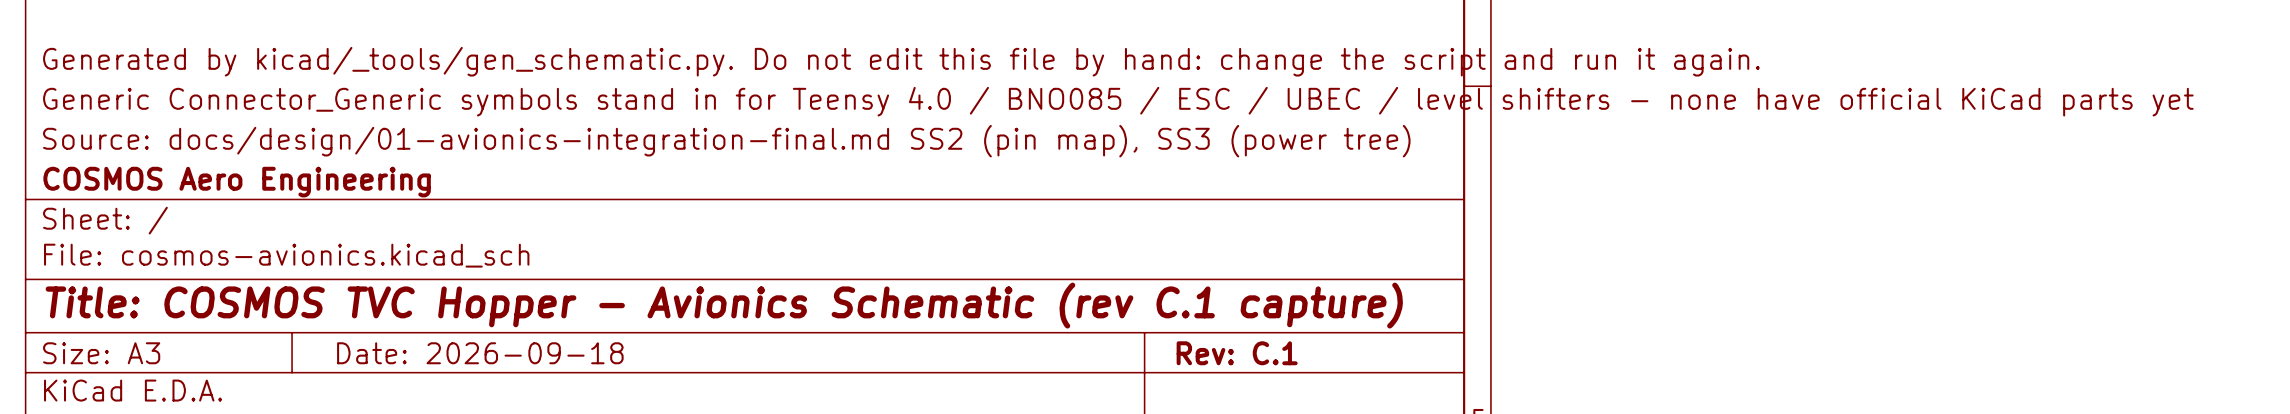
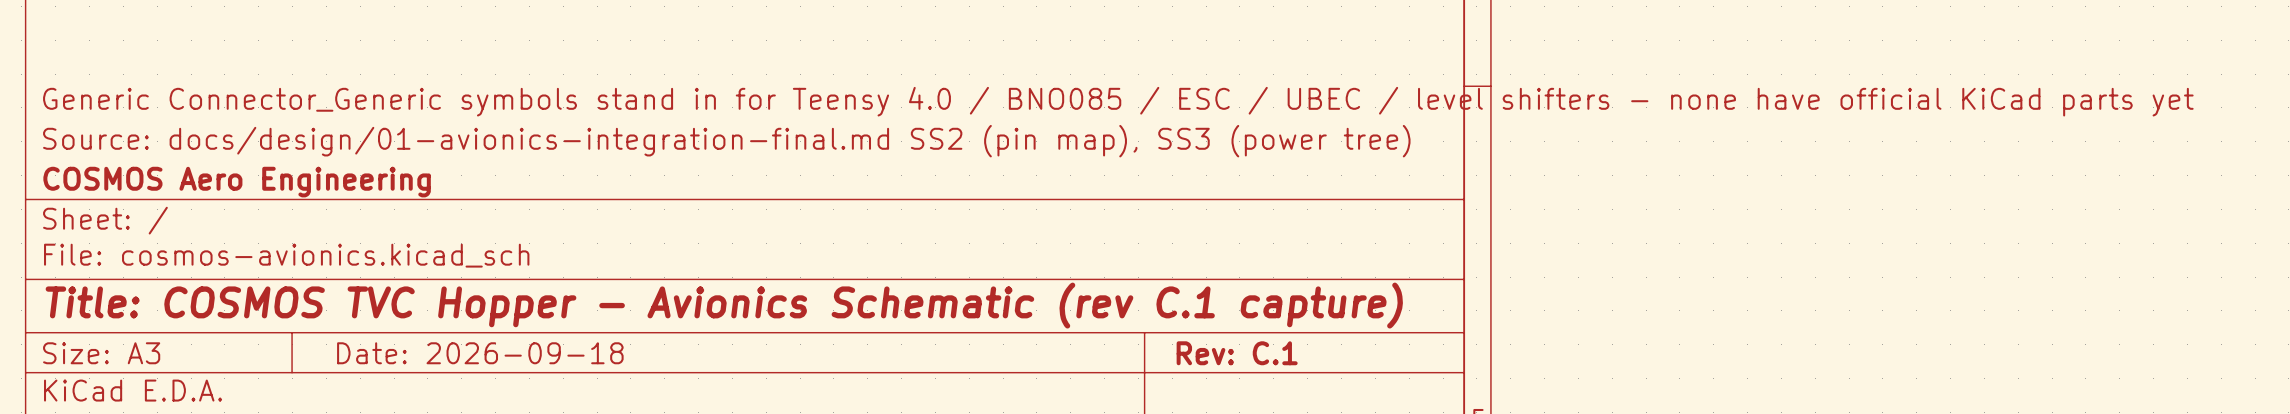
title block: Generated by kicad/_tools/gen_schematic.py. Do not edit this file by hand: change the script and run it again. (901, 61) -> none

